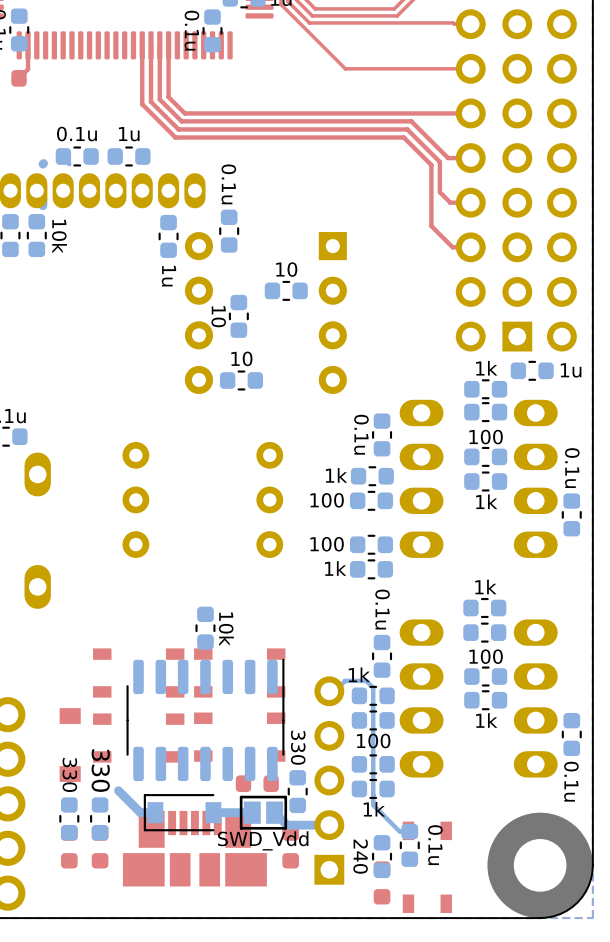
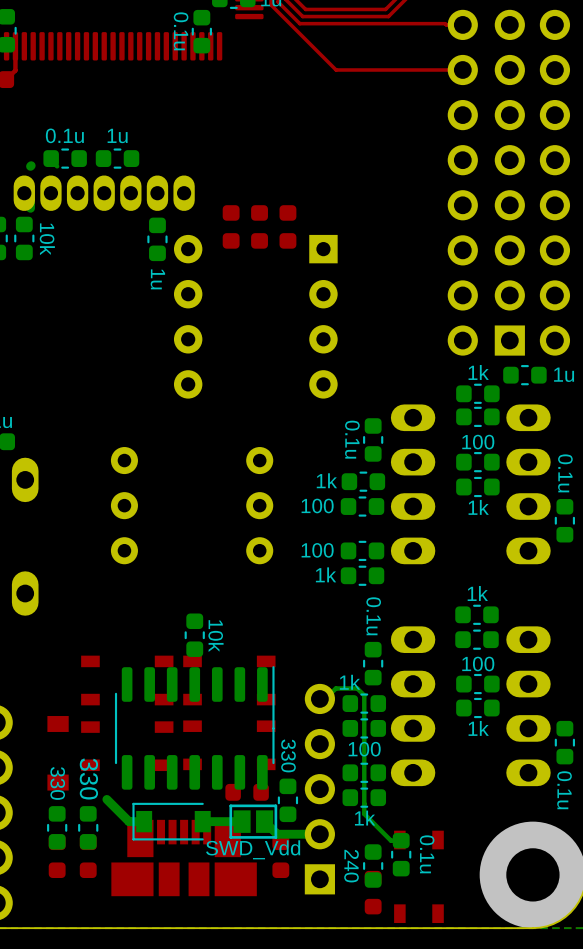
top track: (142, 45) (142, 104) (175, 137) (403, 137) (431, 165) (431, 226) (452, 247) (470, 247) -> none
top track: (151, 45) (151, 101) (178, 129) (407, 129) (439, 161) (439, 192) (450, 202) (470, 202) -> none
top track: (159, 45) (159, 99) (181, 121) (411, 121) (448, 158) (470, 158) -> none
top track: (168, 45) (168, 97) (184, 113) (470, 113) -> none
part: none -> (259, 226)
part: none -> (287, 226)
part side: bottom (229, 231) -> top (231, 226)
part: 10 (286, 290) -> none
part: 10 (238, 316) -> none
part: 10 (241, 380) -> none

